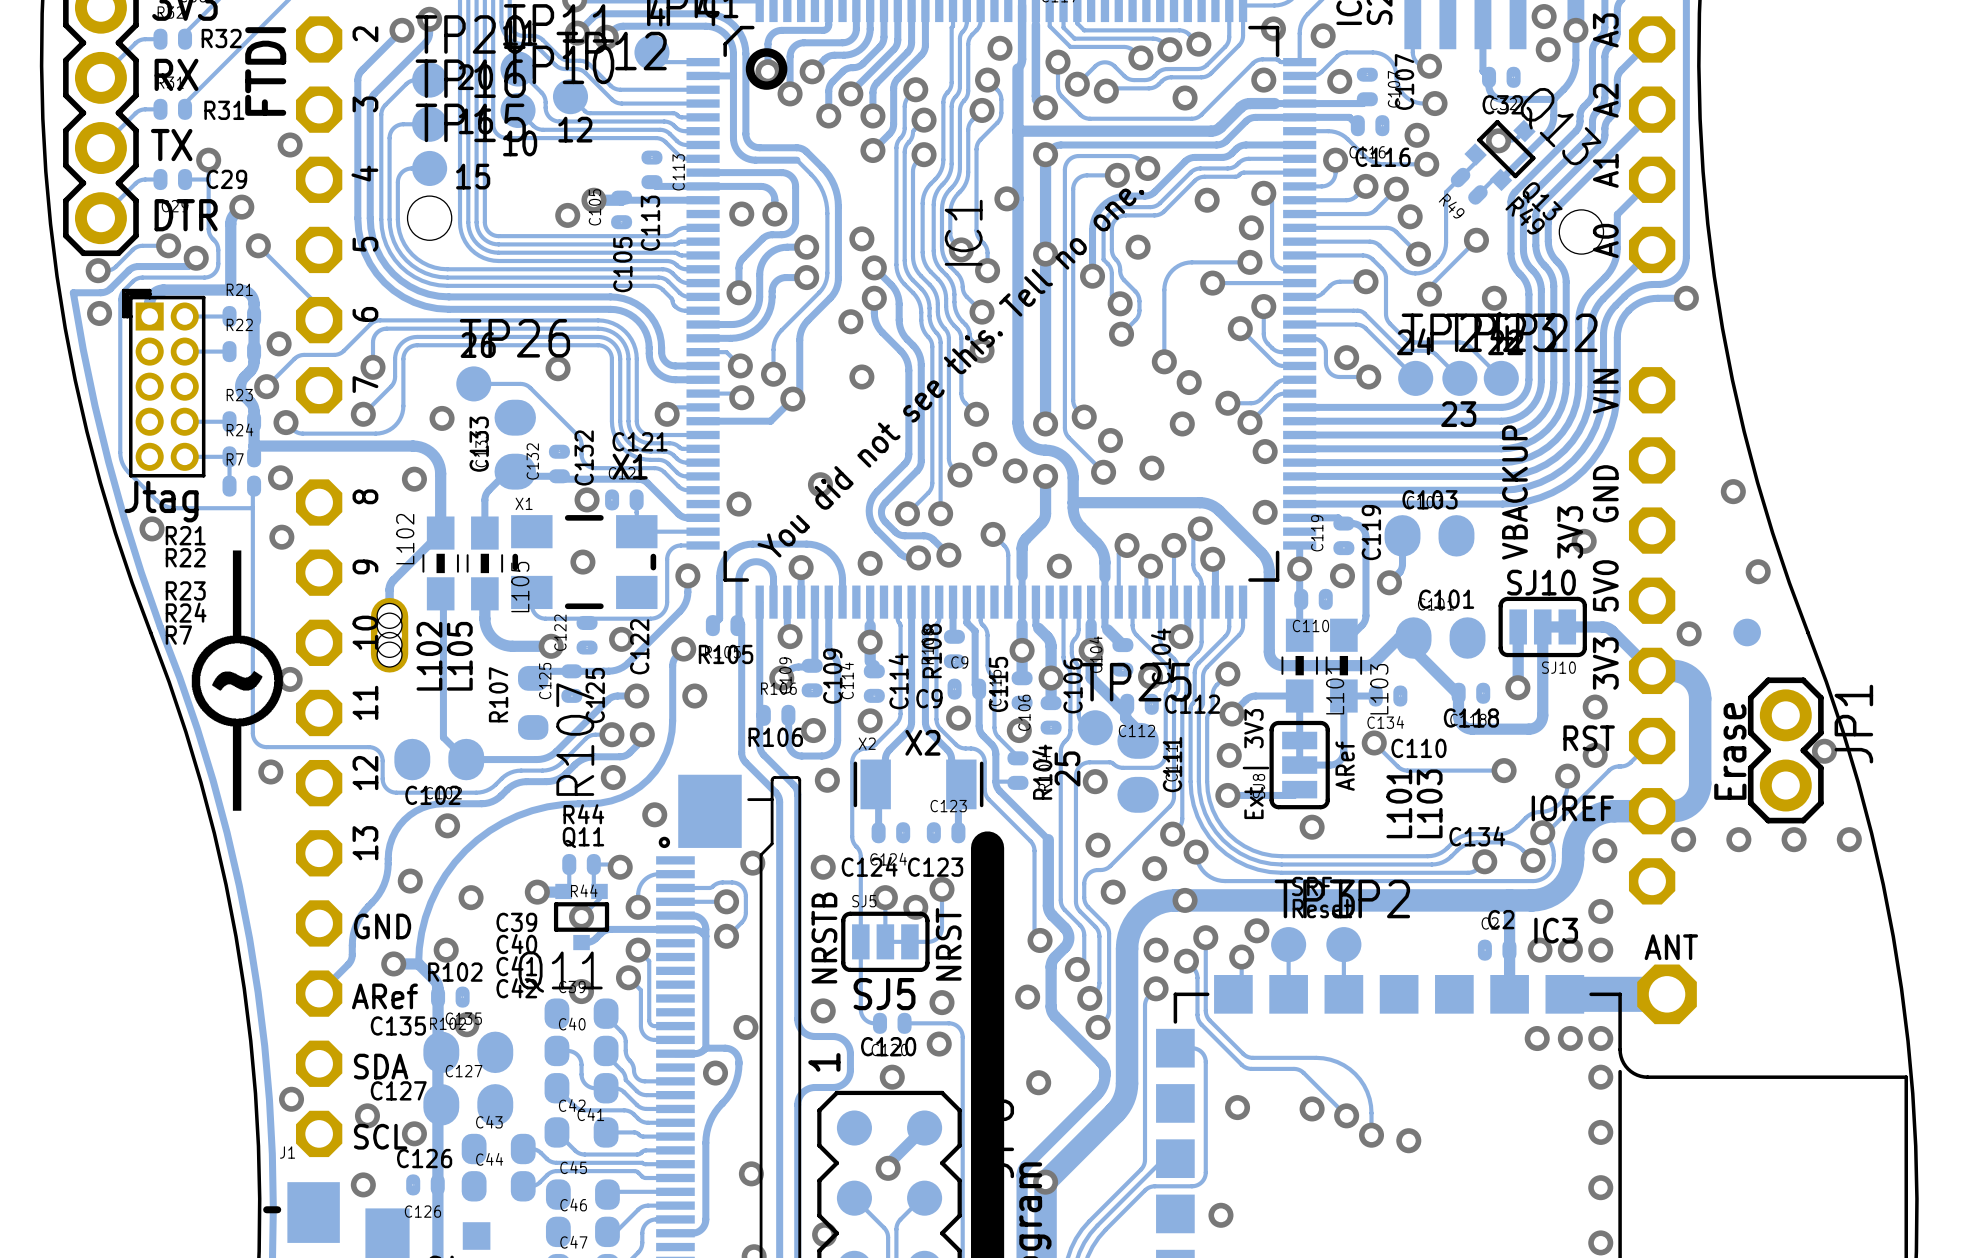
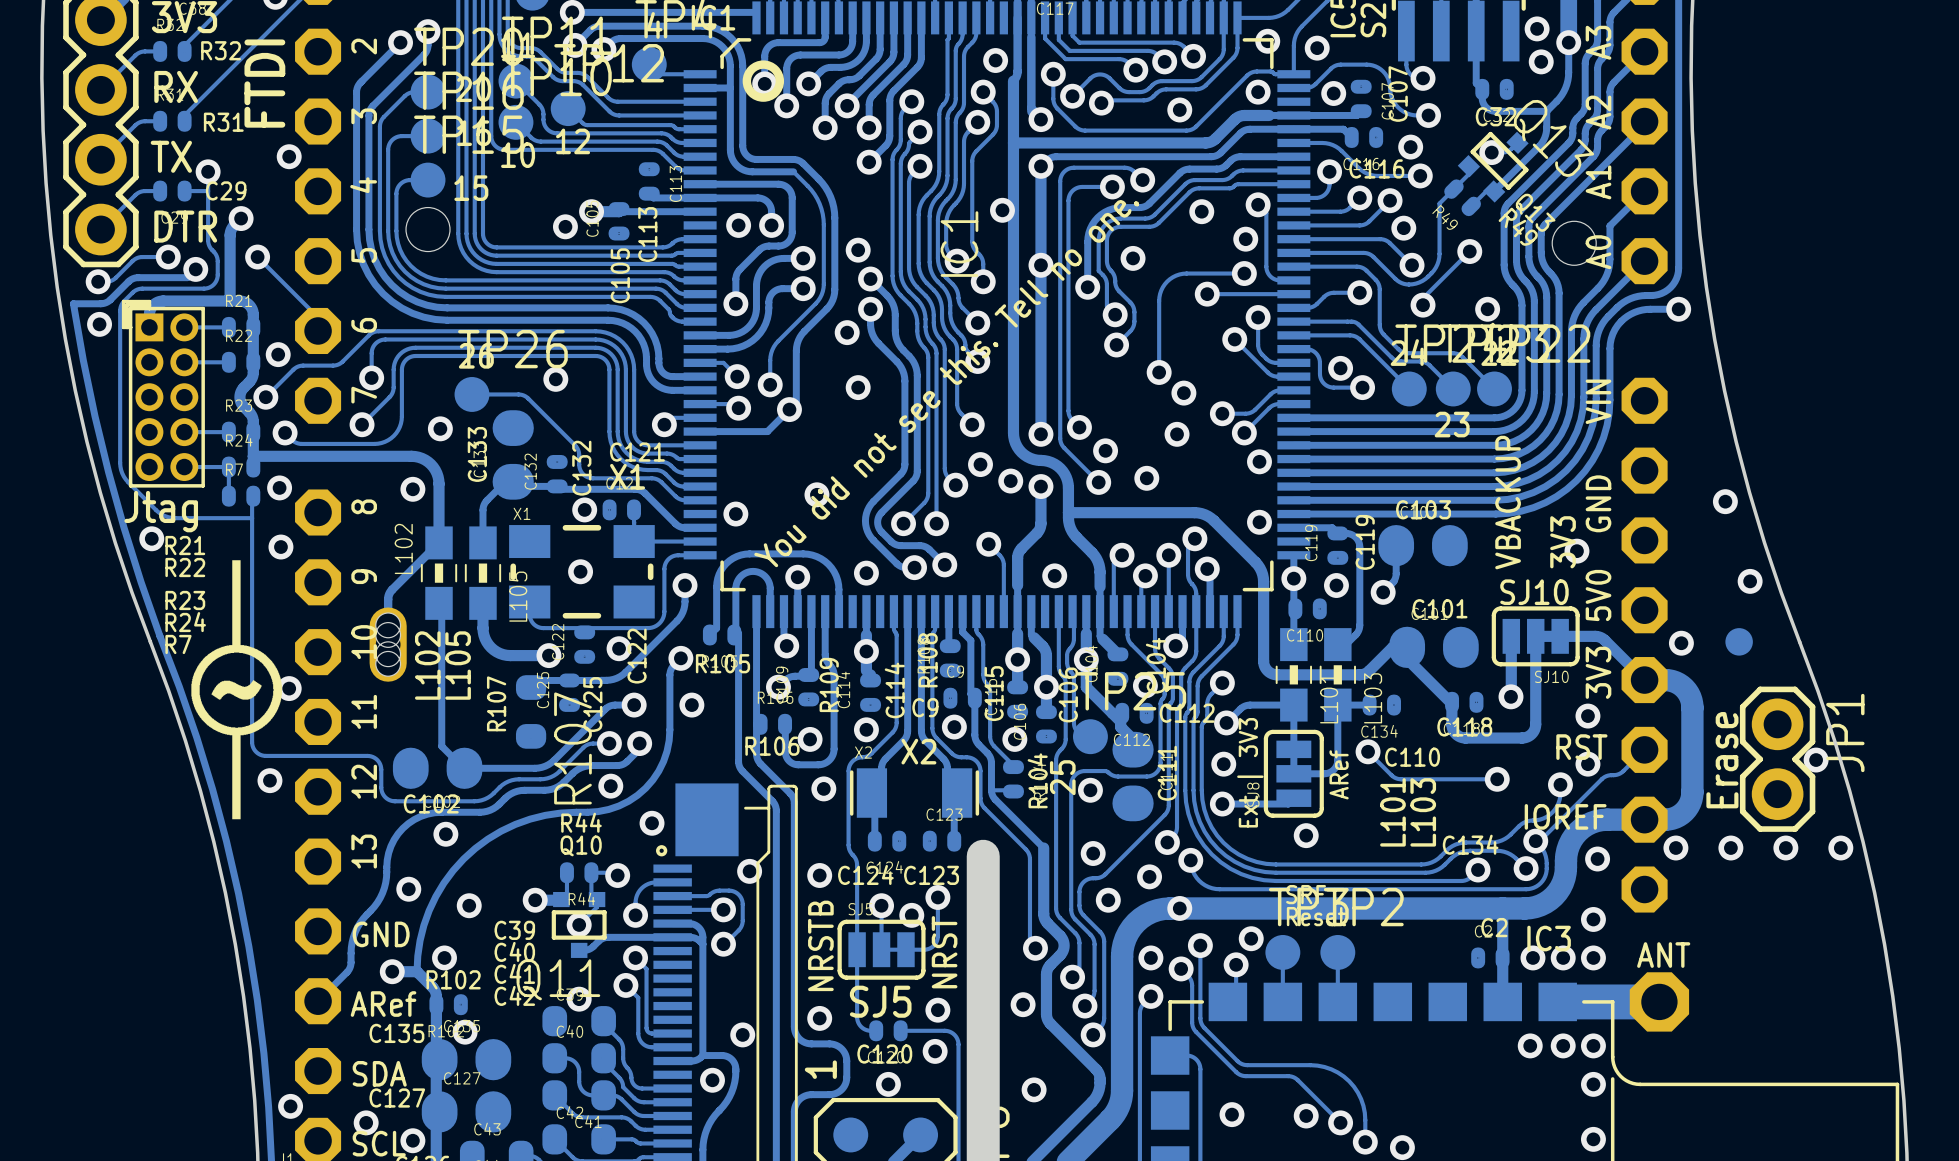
text: C109 (832, 676) -> R109 (829, 684)
text: Q11 (583, 837) -> Q10 (581, 845)

